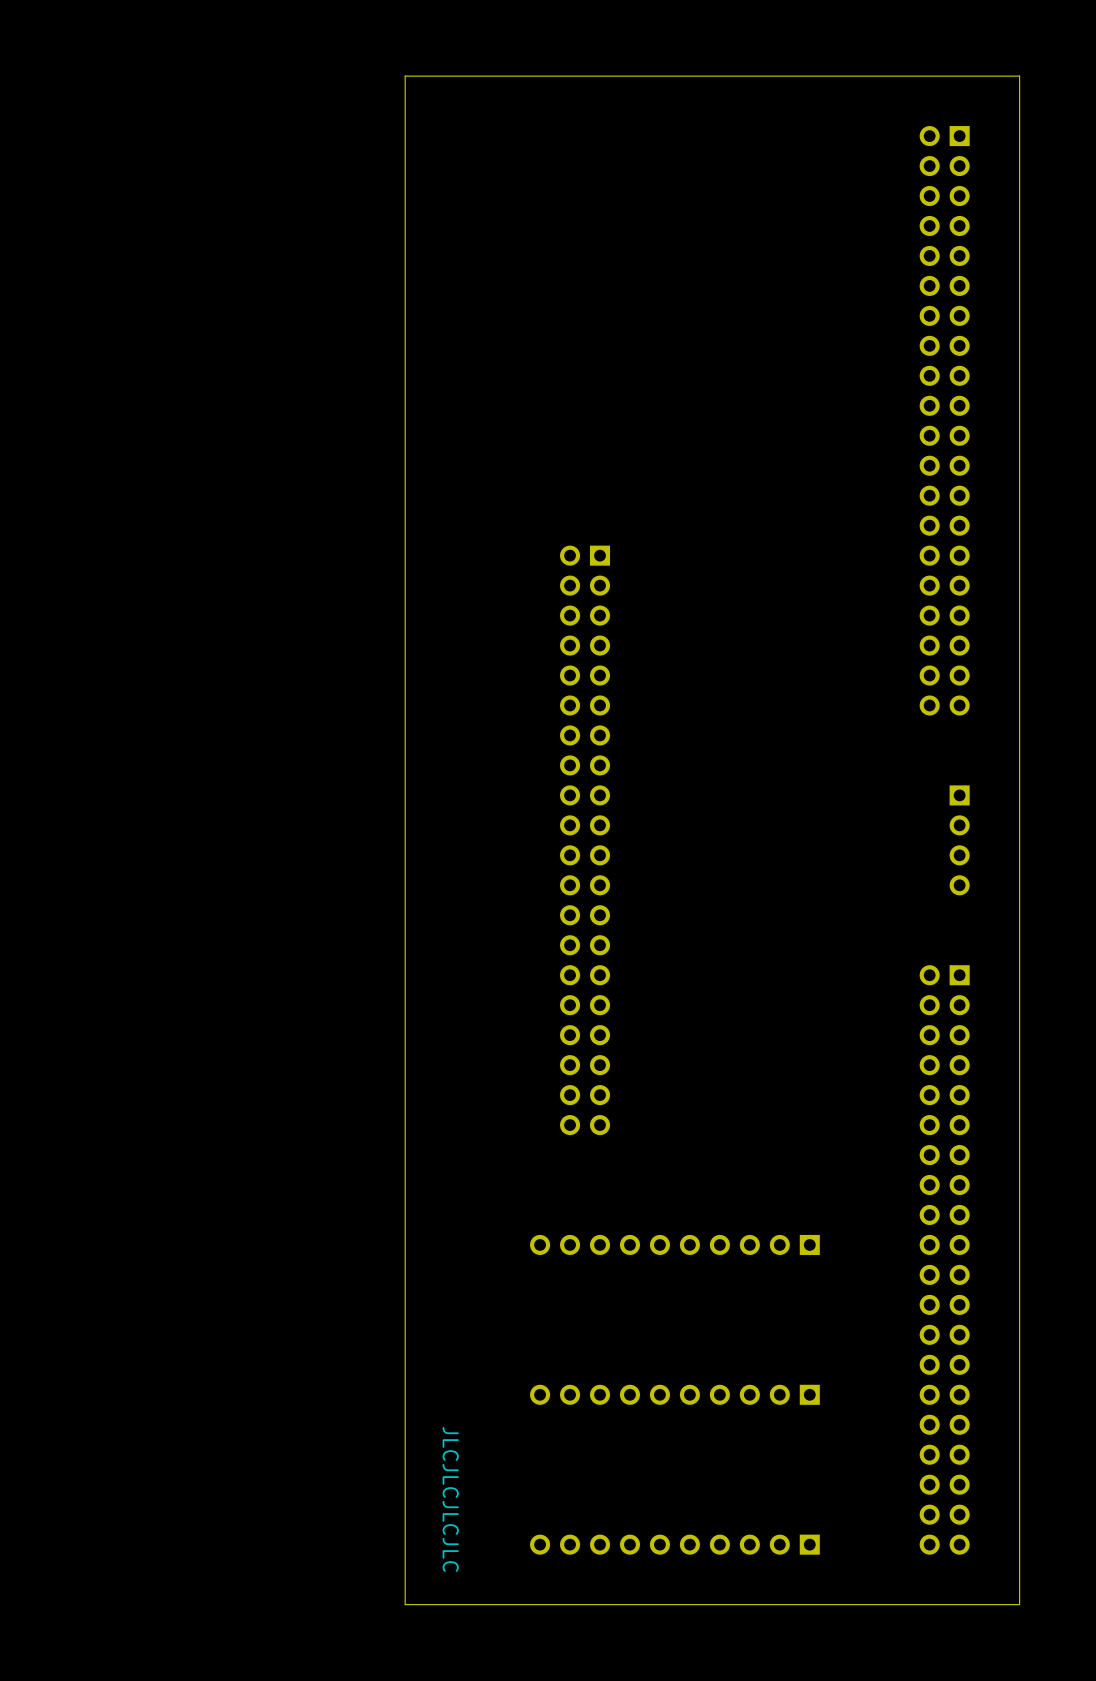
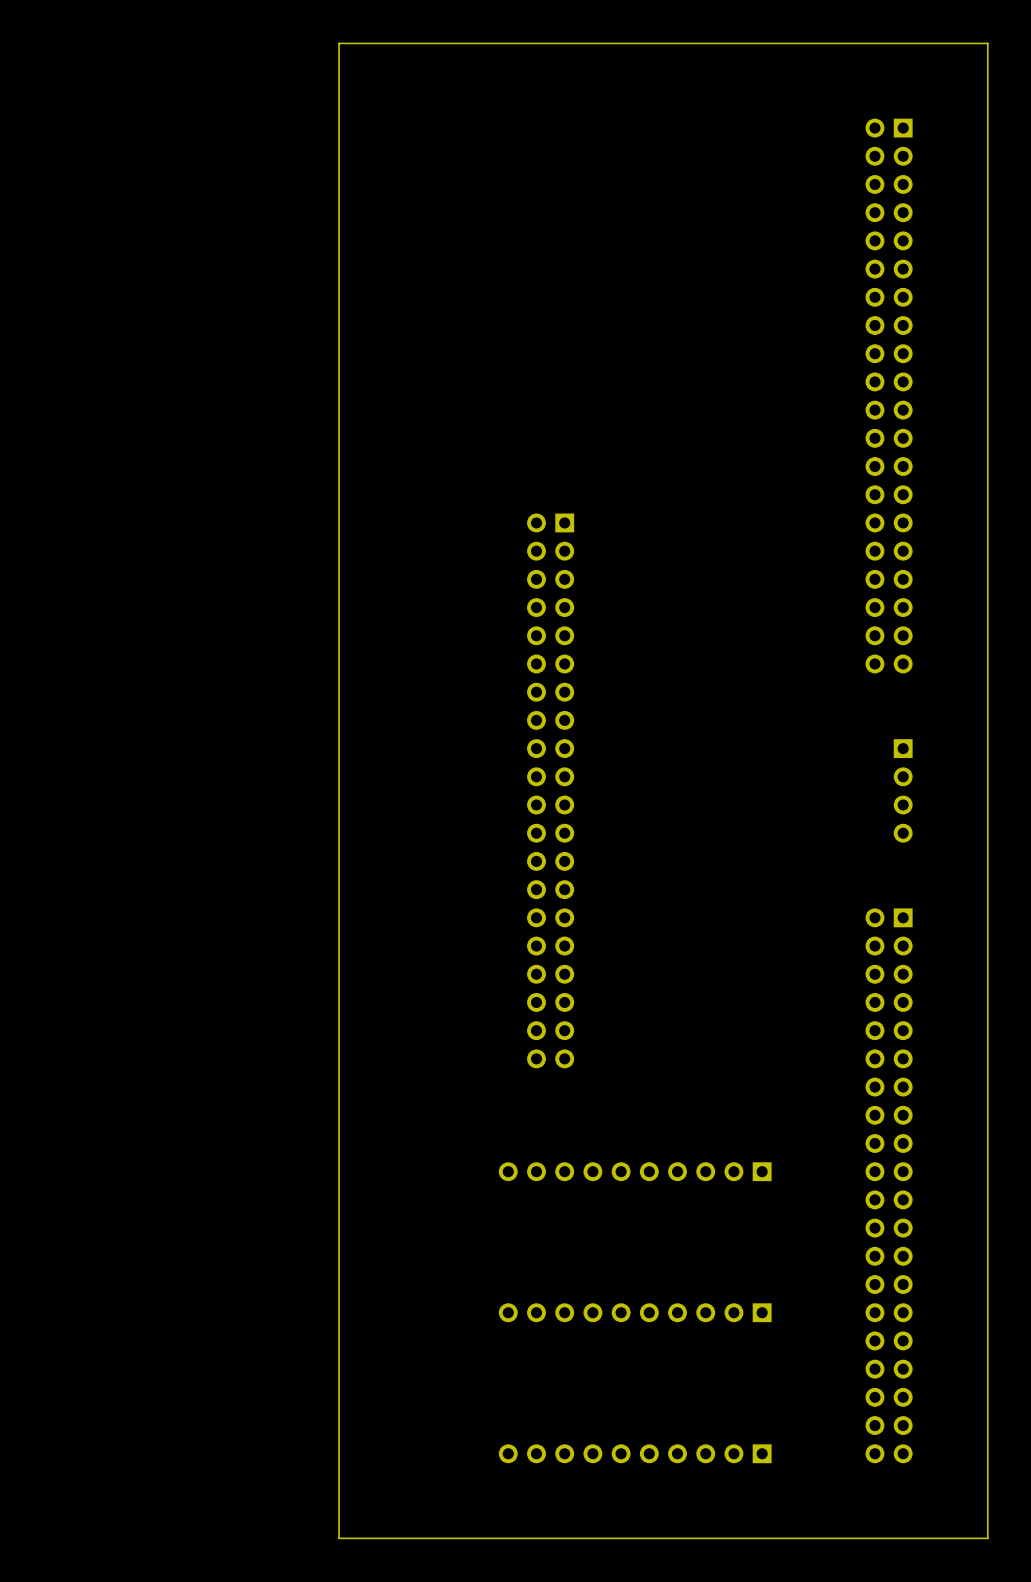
board edge: (1019, 76) (405, 76) (405, 1604) (1019, 1604) (1019, 76) -> (987, 43) (987, 1538) (339, 1538) (339, 43) (987, 43)
text: JLCJLCJLCJLC (450, 1499) -> none

